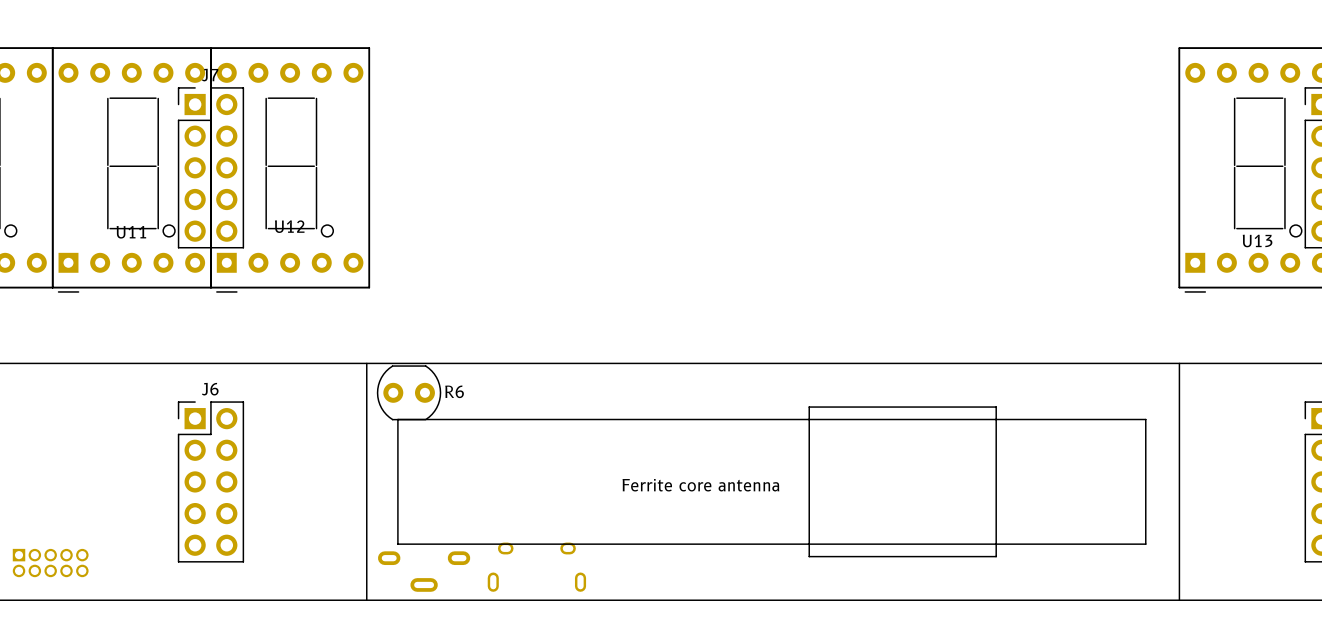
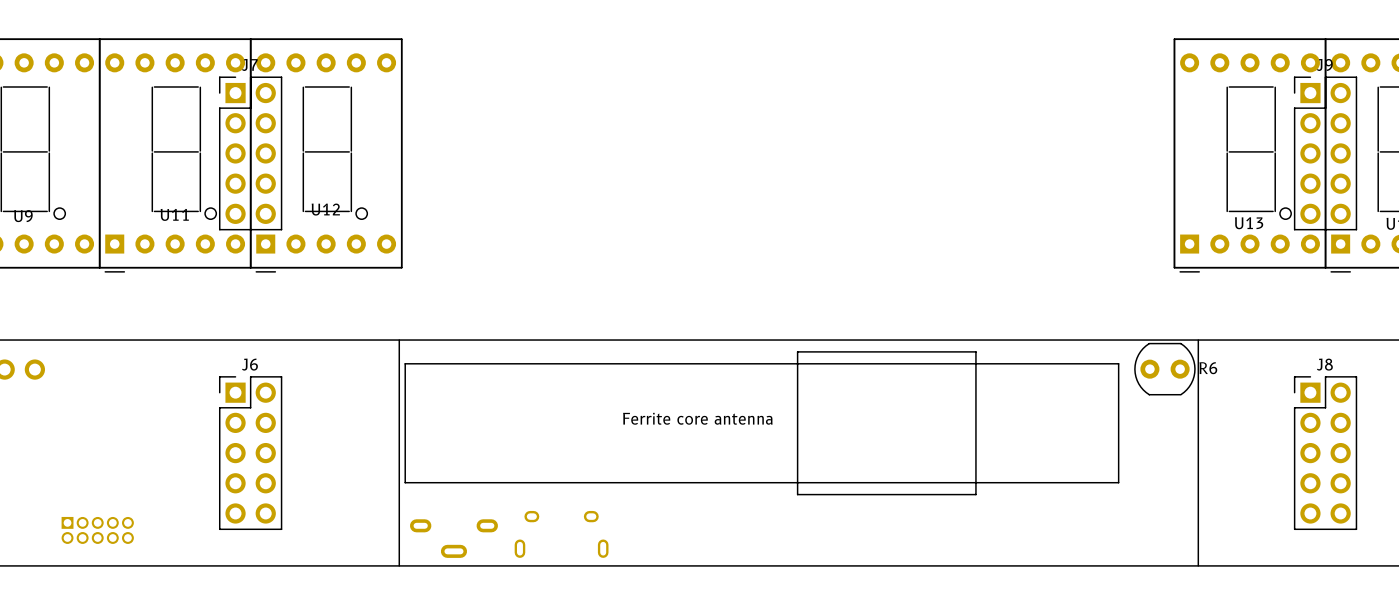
line: (1179, 363) (1179, 600) -> (1198, 340) (1198, 565)
R6 position: (409, 392) -> (1164, 369)
line: (809, 407) (996, 407) (996, 556) (809, 556) (809, 407) -> (797, 351) (975, 351) (975, 494) (797, 494) (797, 351)
line: (397, 419) (1145, 419) (1145, 544) (397, 544) (397, 419) -> (405, 363) (1118, 363) (1118, 482) (405, 482) (405, 363)
text position: Ferrite core antenna (700, 485) -> Ferrite core antenna (697, 418)

